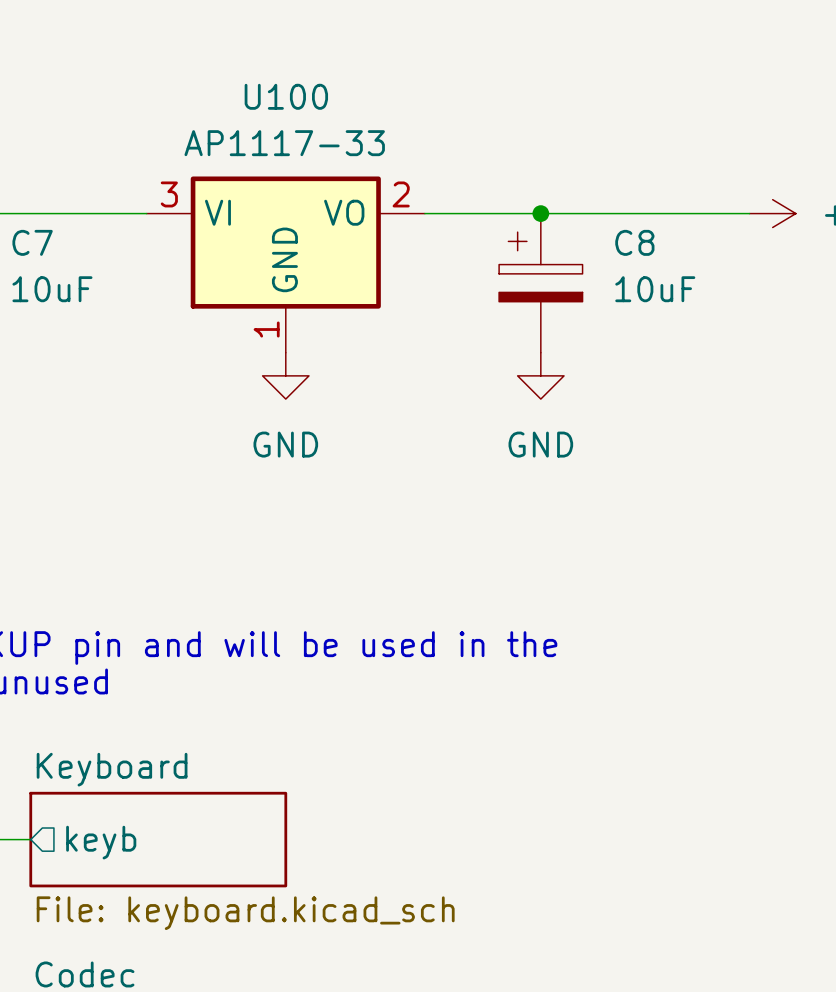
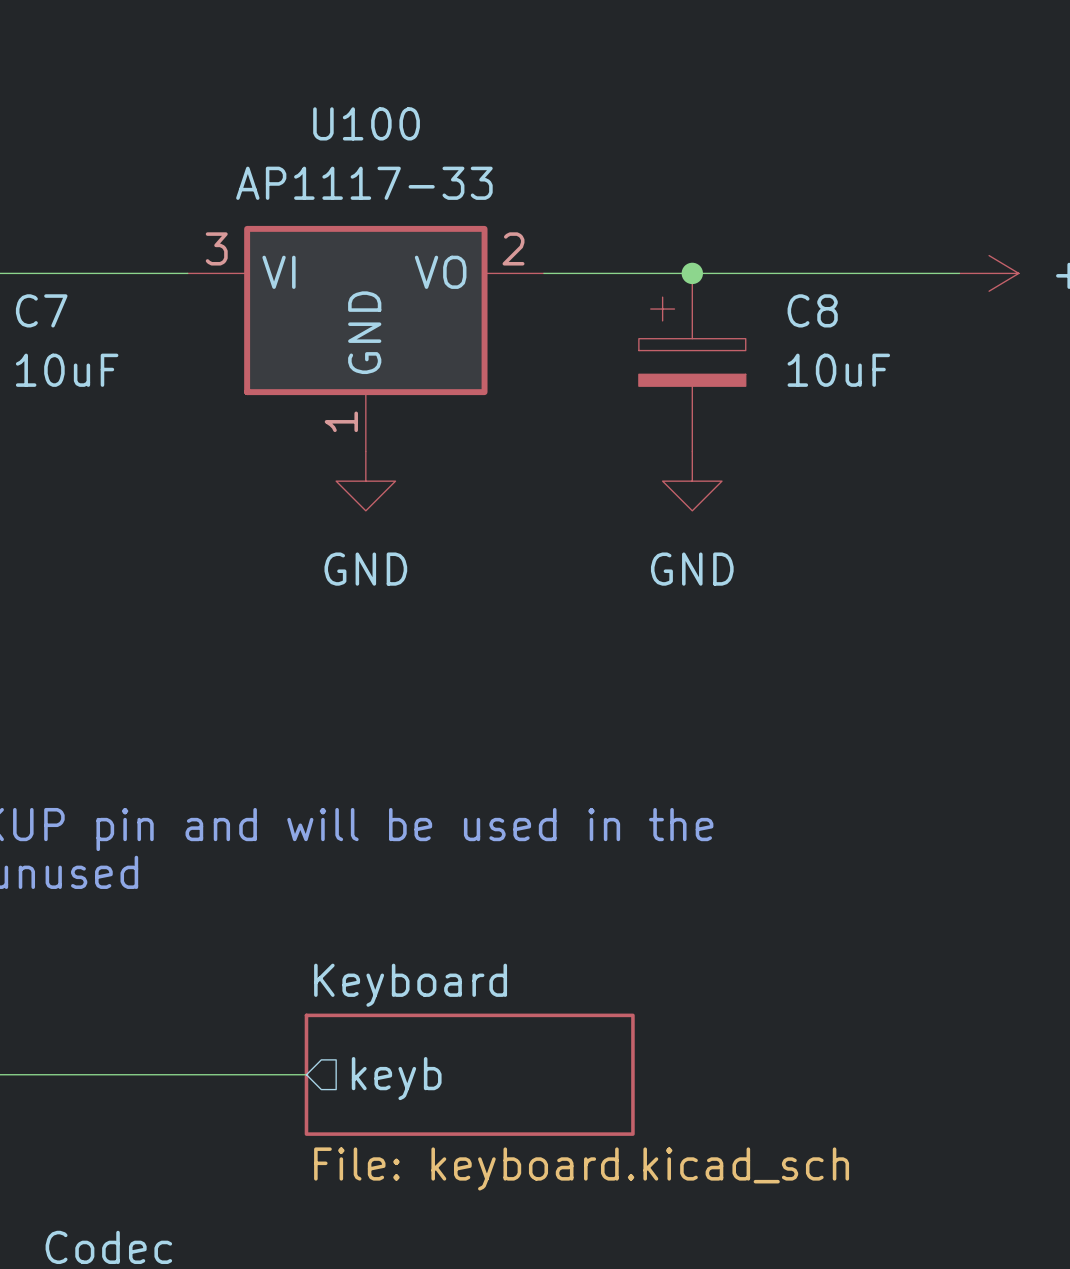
wire: none -> (39, 1074) (306, 1074)
sheet Keyboard position: (158, 839) -> (469, 1074)
sheet pin position: keyb (101, 842) -> keyb (396, 1078)

